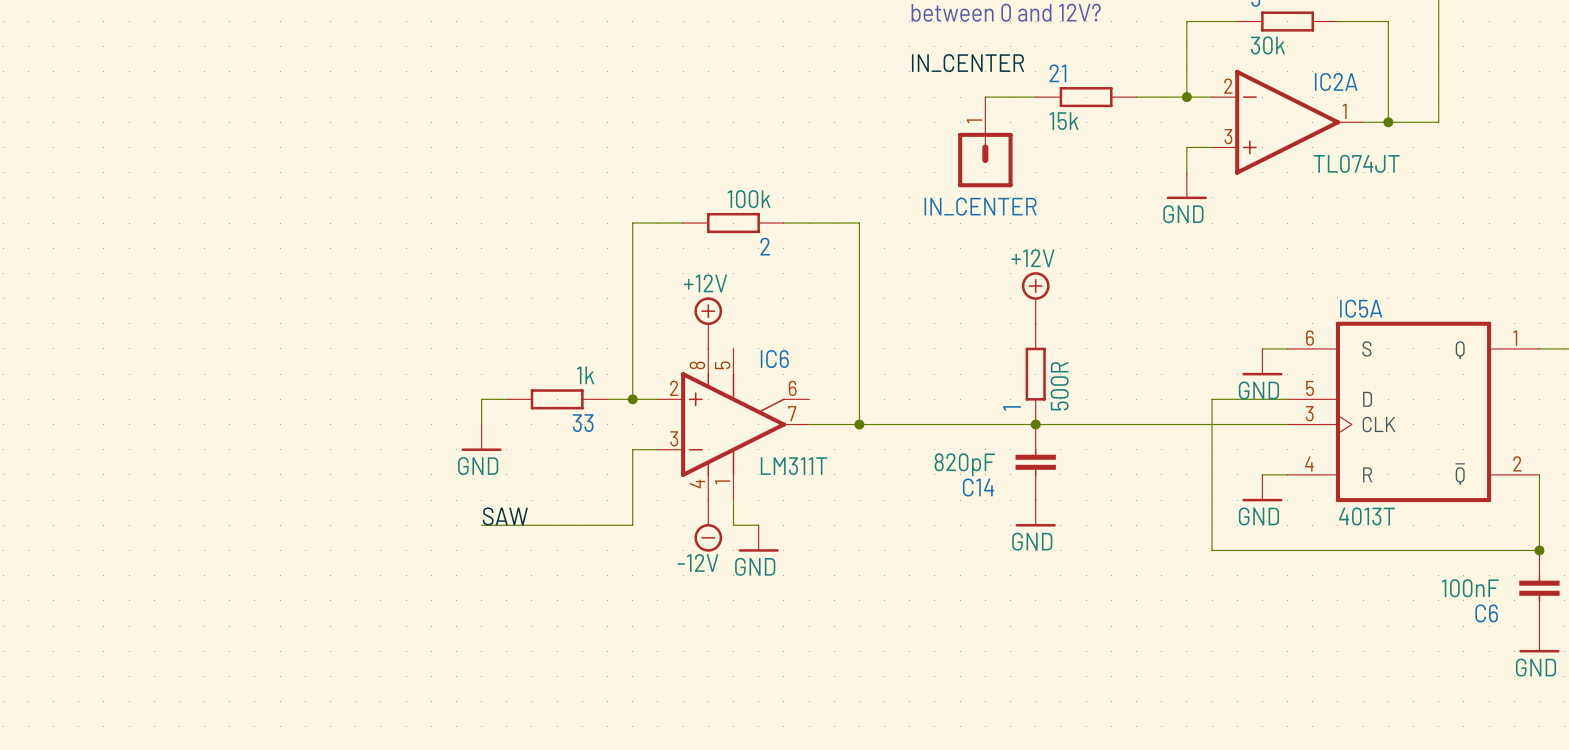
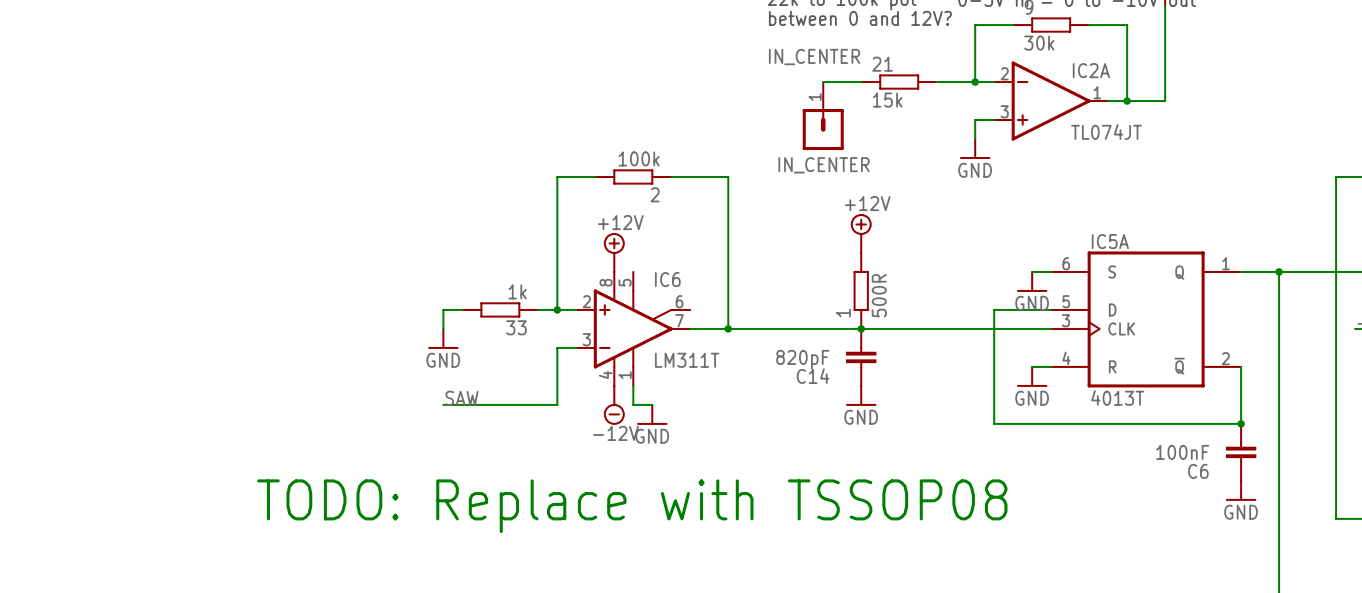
text: none -> TODO: Replace with TSSOP08 (632, 506)

